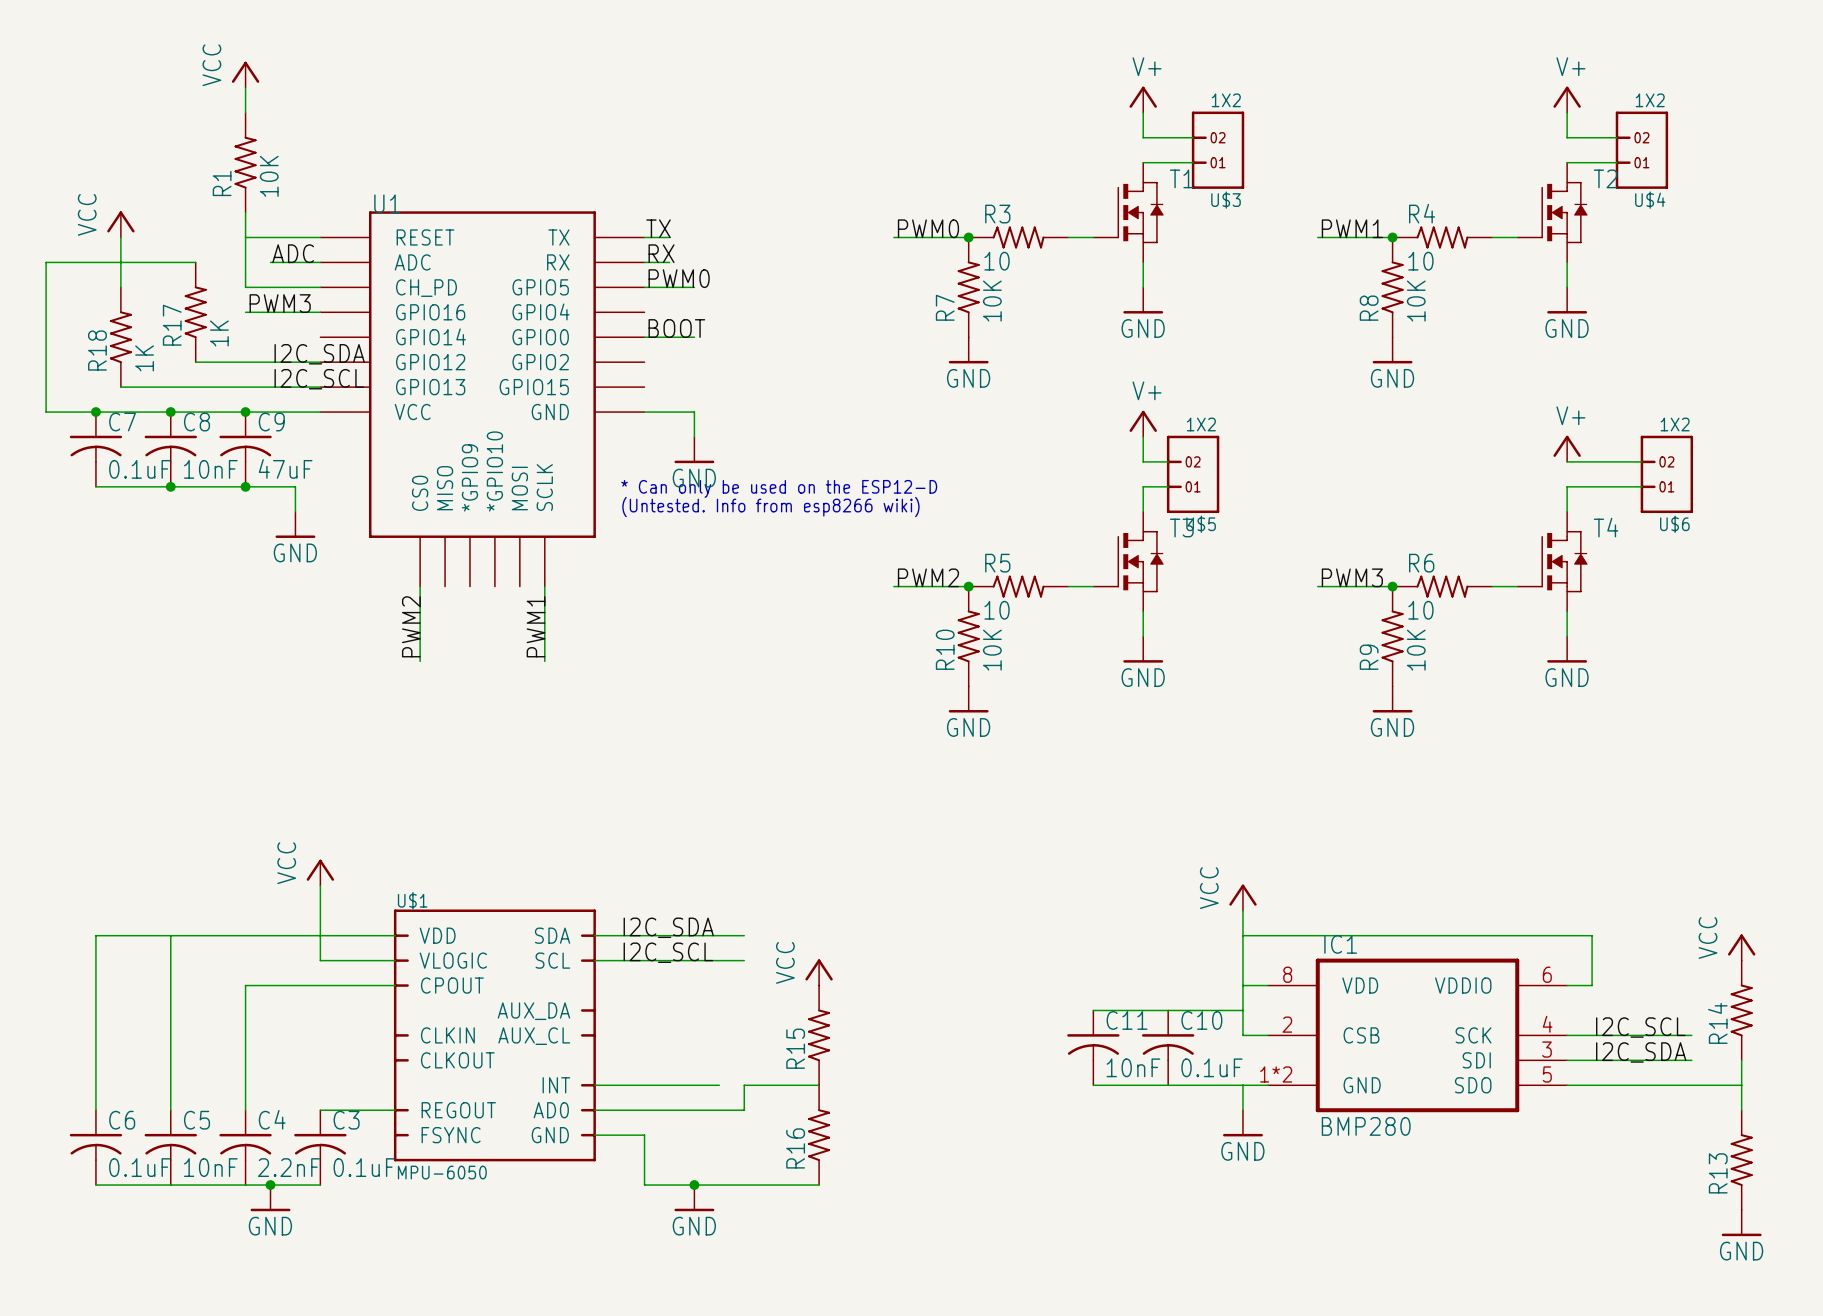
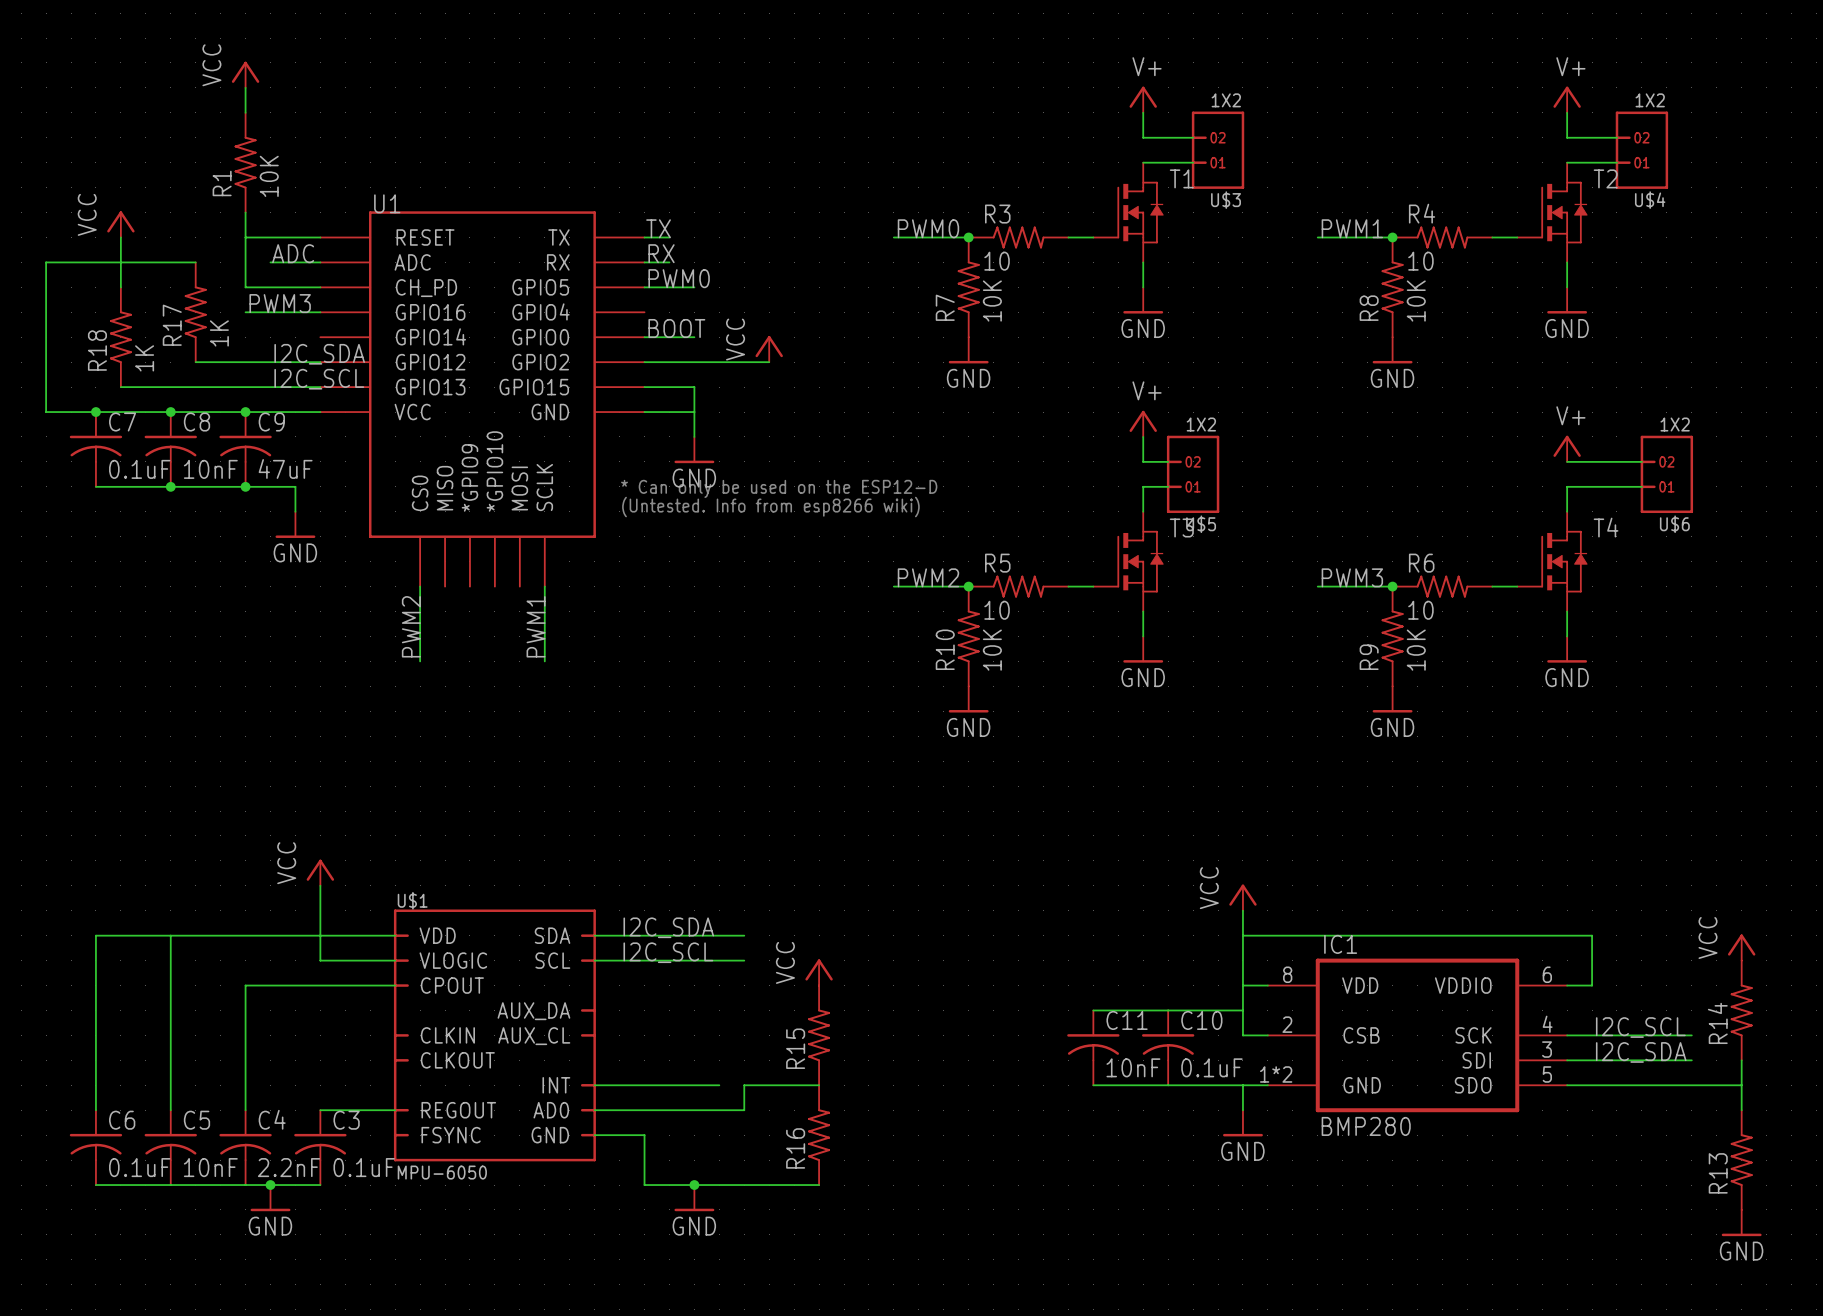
power symbol: none -> VCC (769, 349)
wire: none -> (644, 362) (769, 362)
wire: none -> (644, 387) (694, 387) (694, 412)

